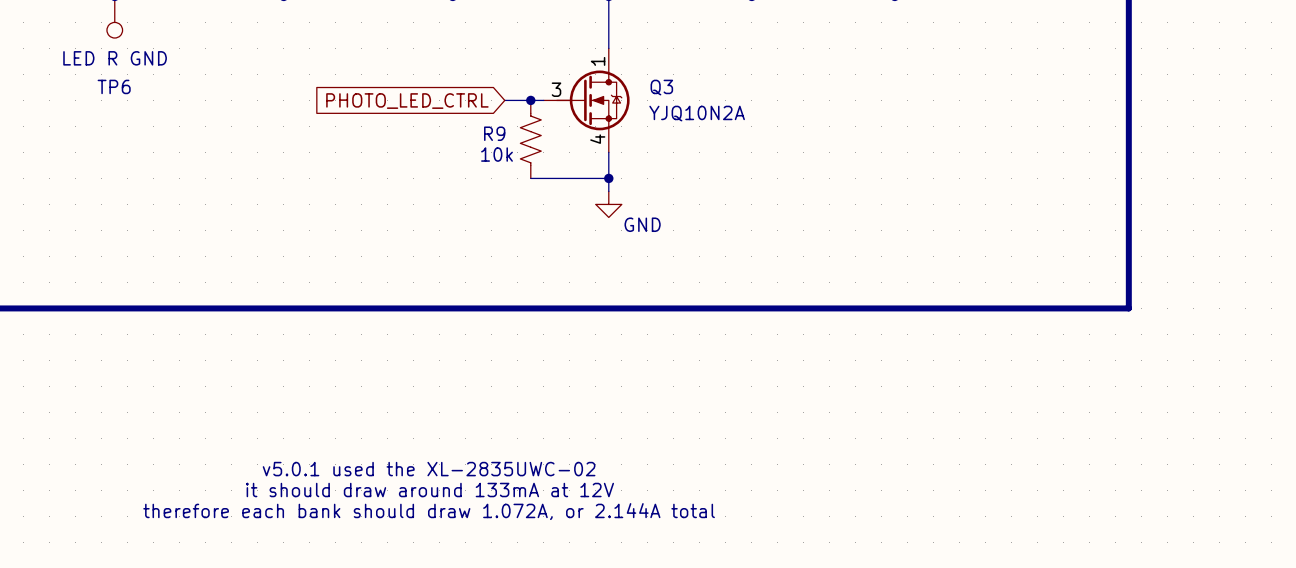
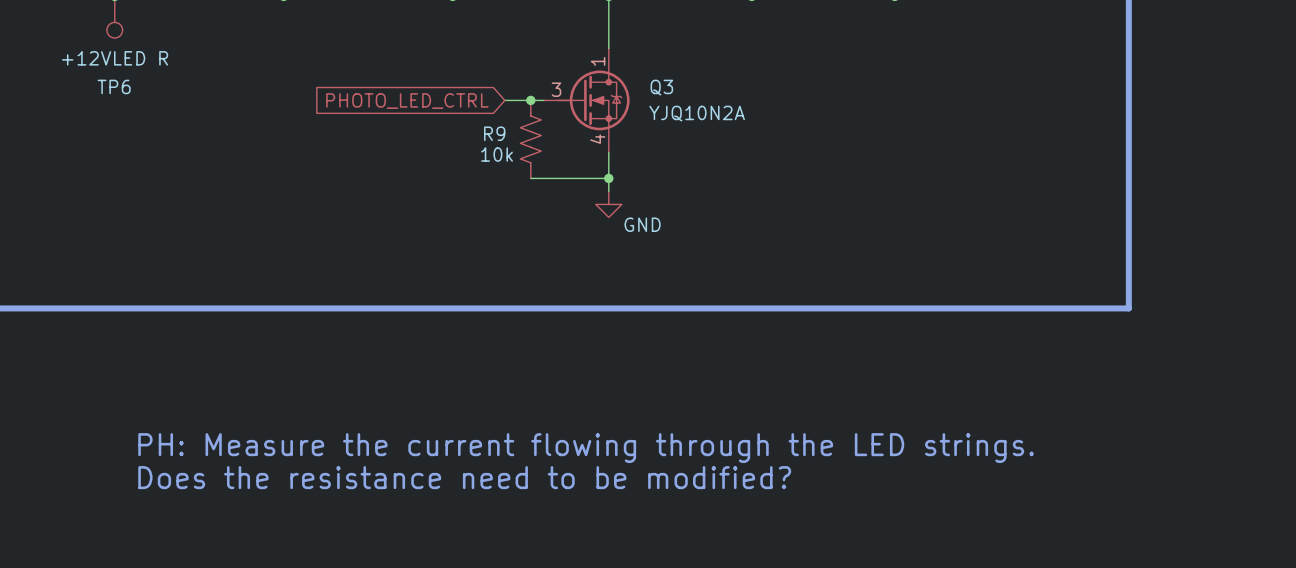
TP6 value: LED R GND (115, 58) -> +12VLED R (115, 58)
text: none -> PH: Measure the current flowing through the LED strings. (586, 448)
text: v5.0.1 used the XL-2835UWC-02 (429, 469) -> none
text: none -> Does the resistance need to be modified? (464, 477)
text: it should draw around 133mA at 12V (430, 490) -> none
text: therefore each bank should draw 1.072A, or 2.144A total (429, 511) -> none

